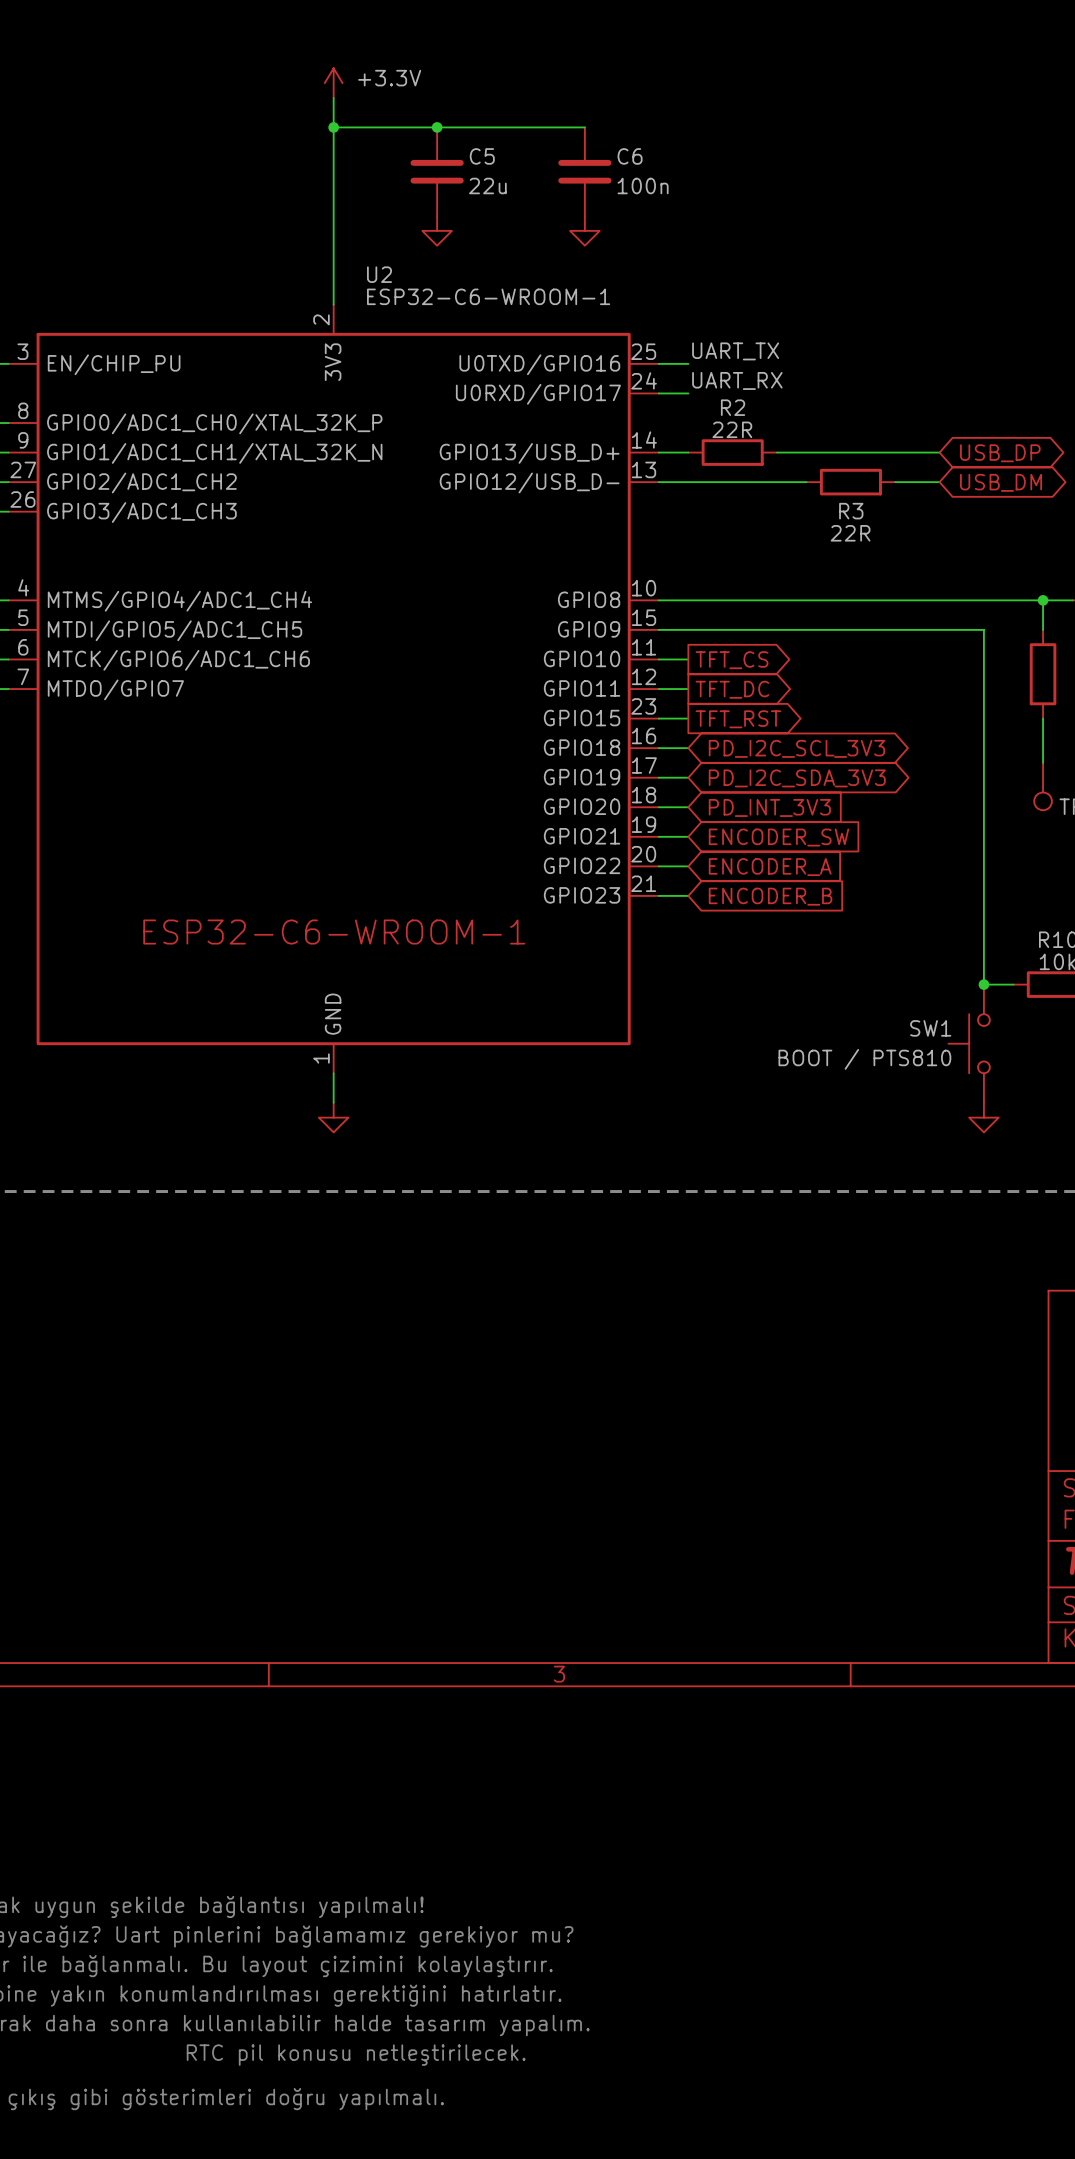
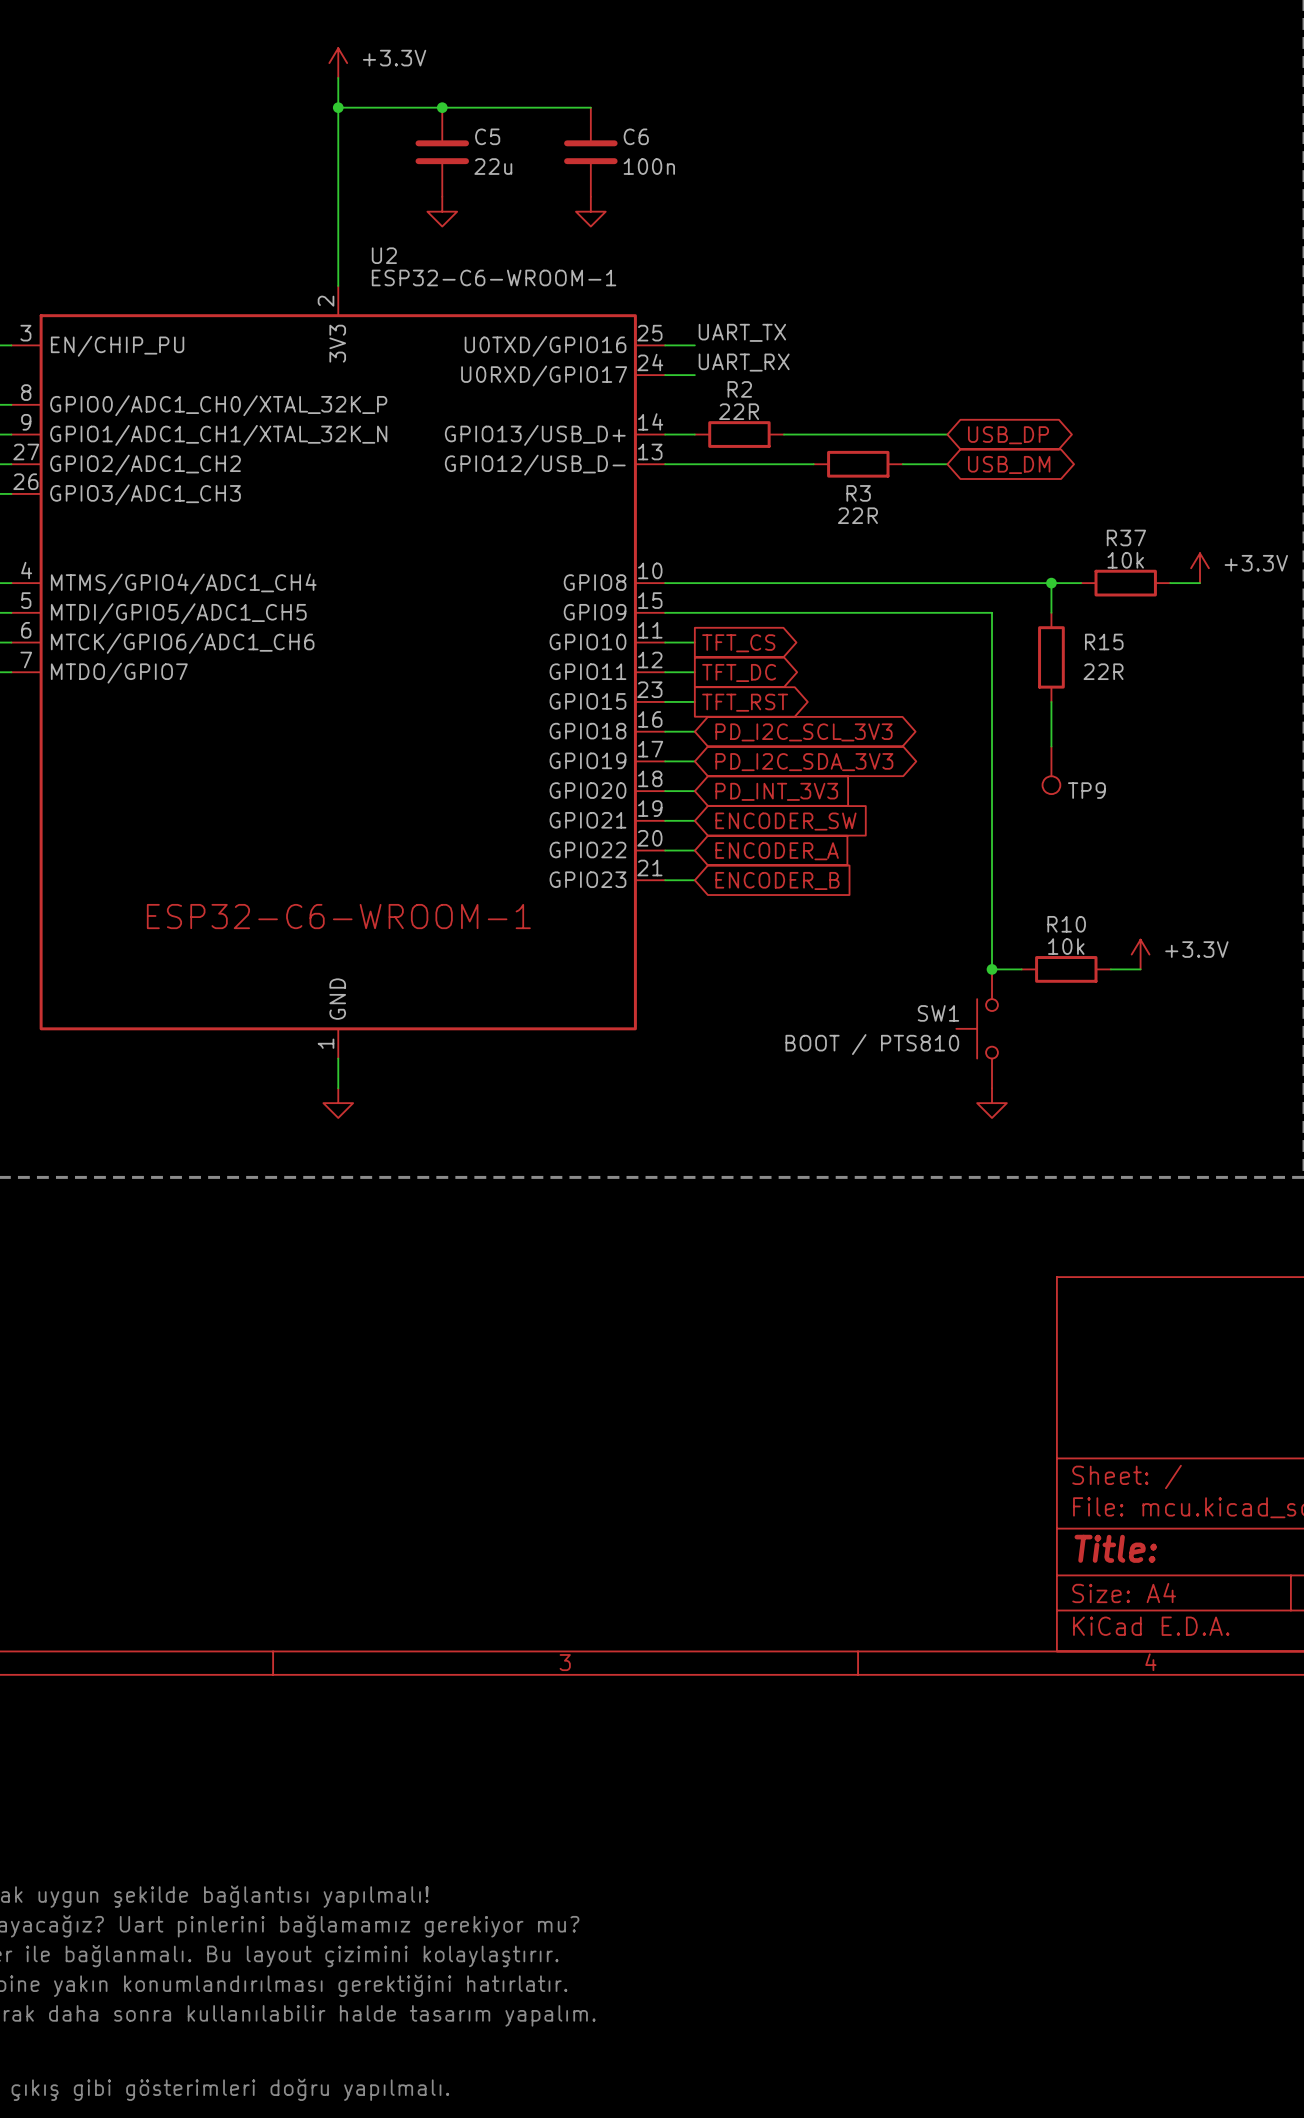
text: RTC pil konusu netleştirilecek. (356, 2055) -> none

